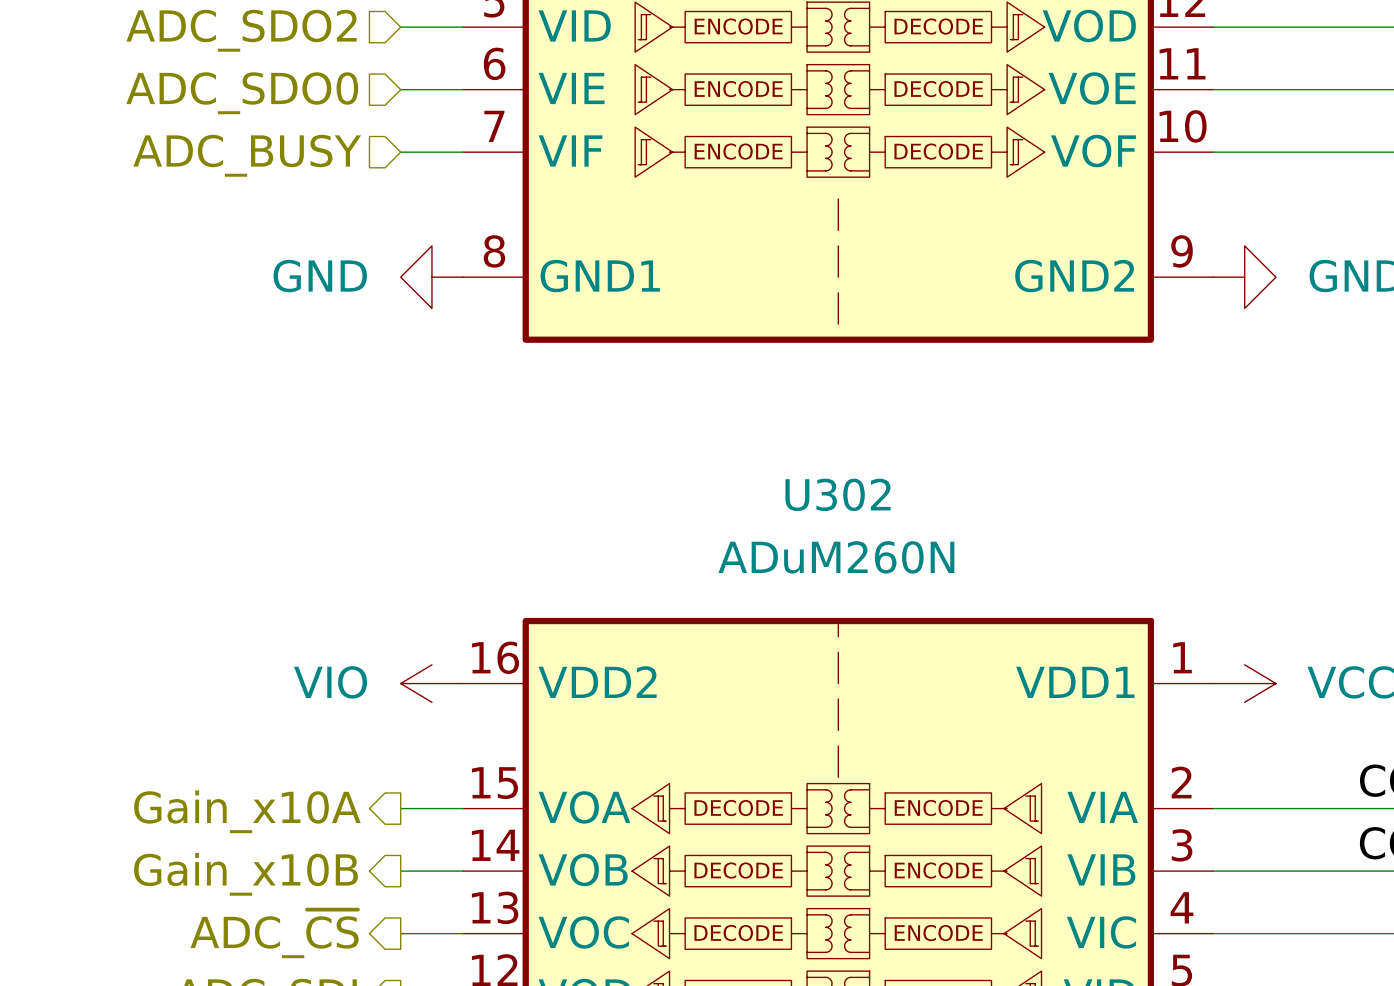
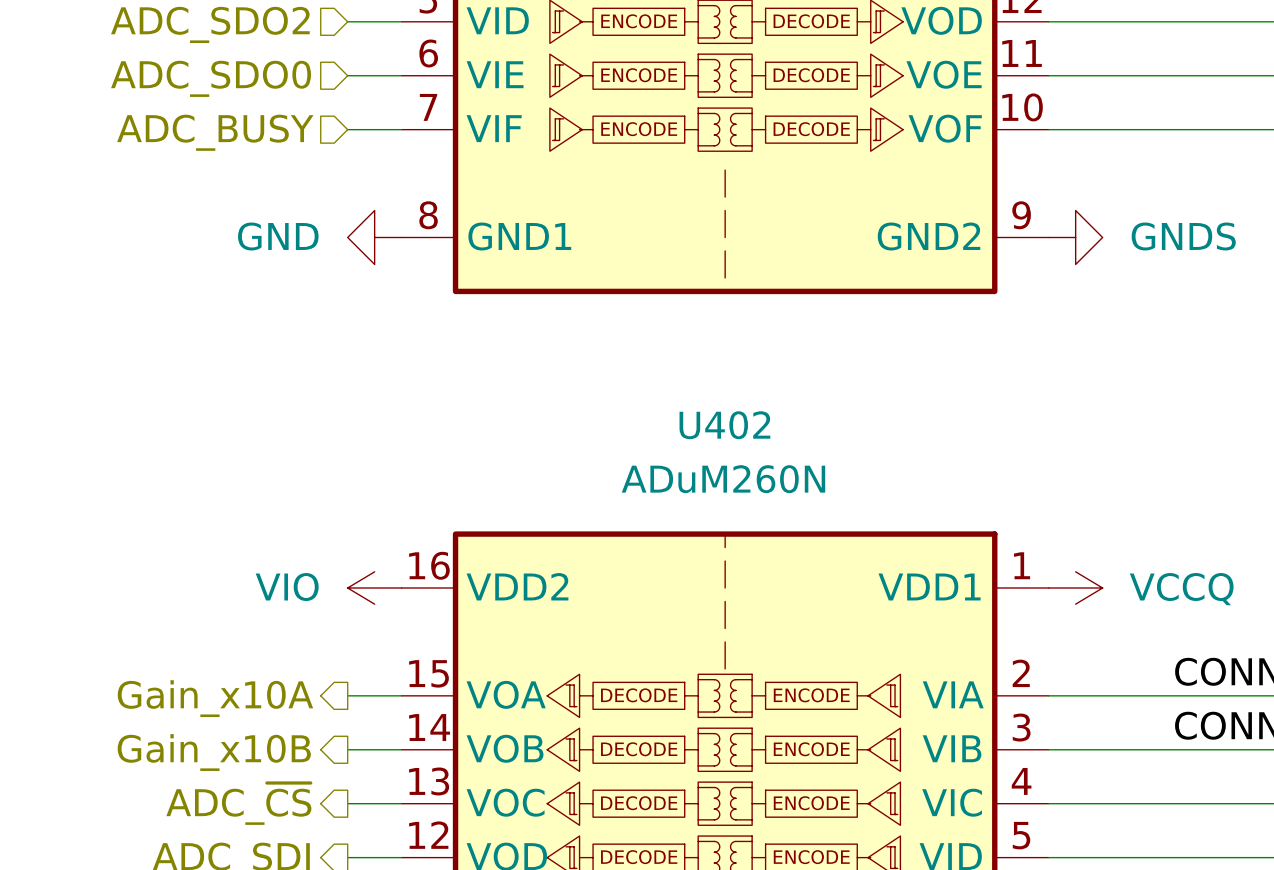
U302 name: U302 (838, 494) -> U402 (724, 425)

